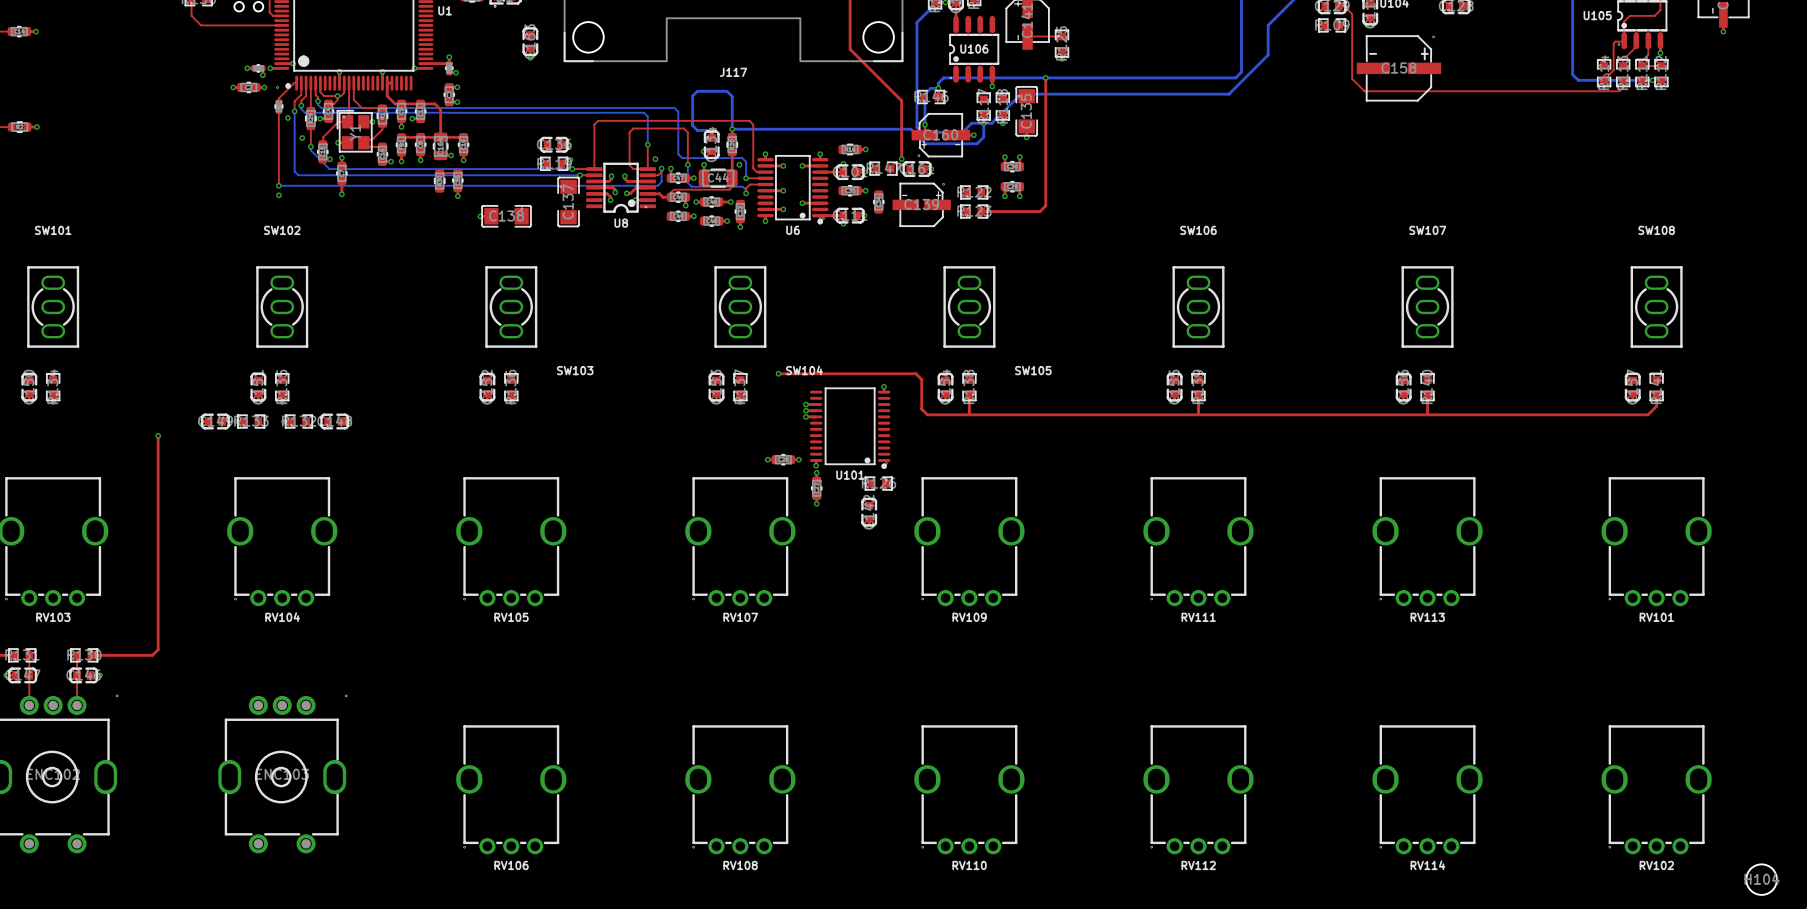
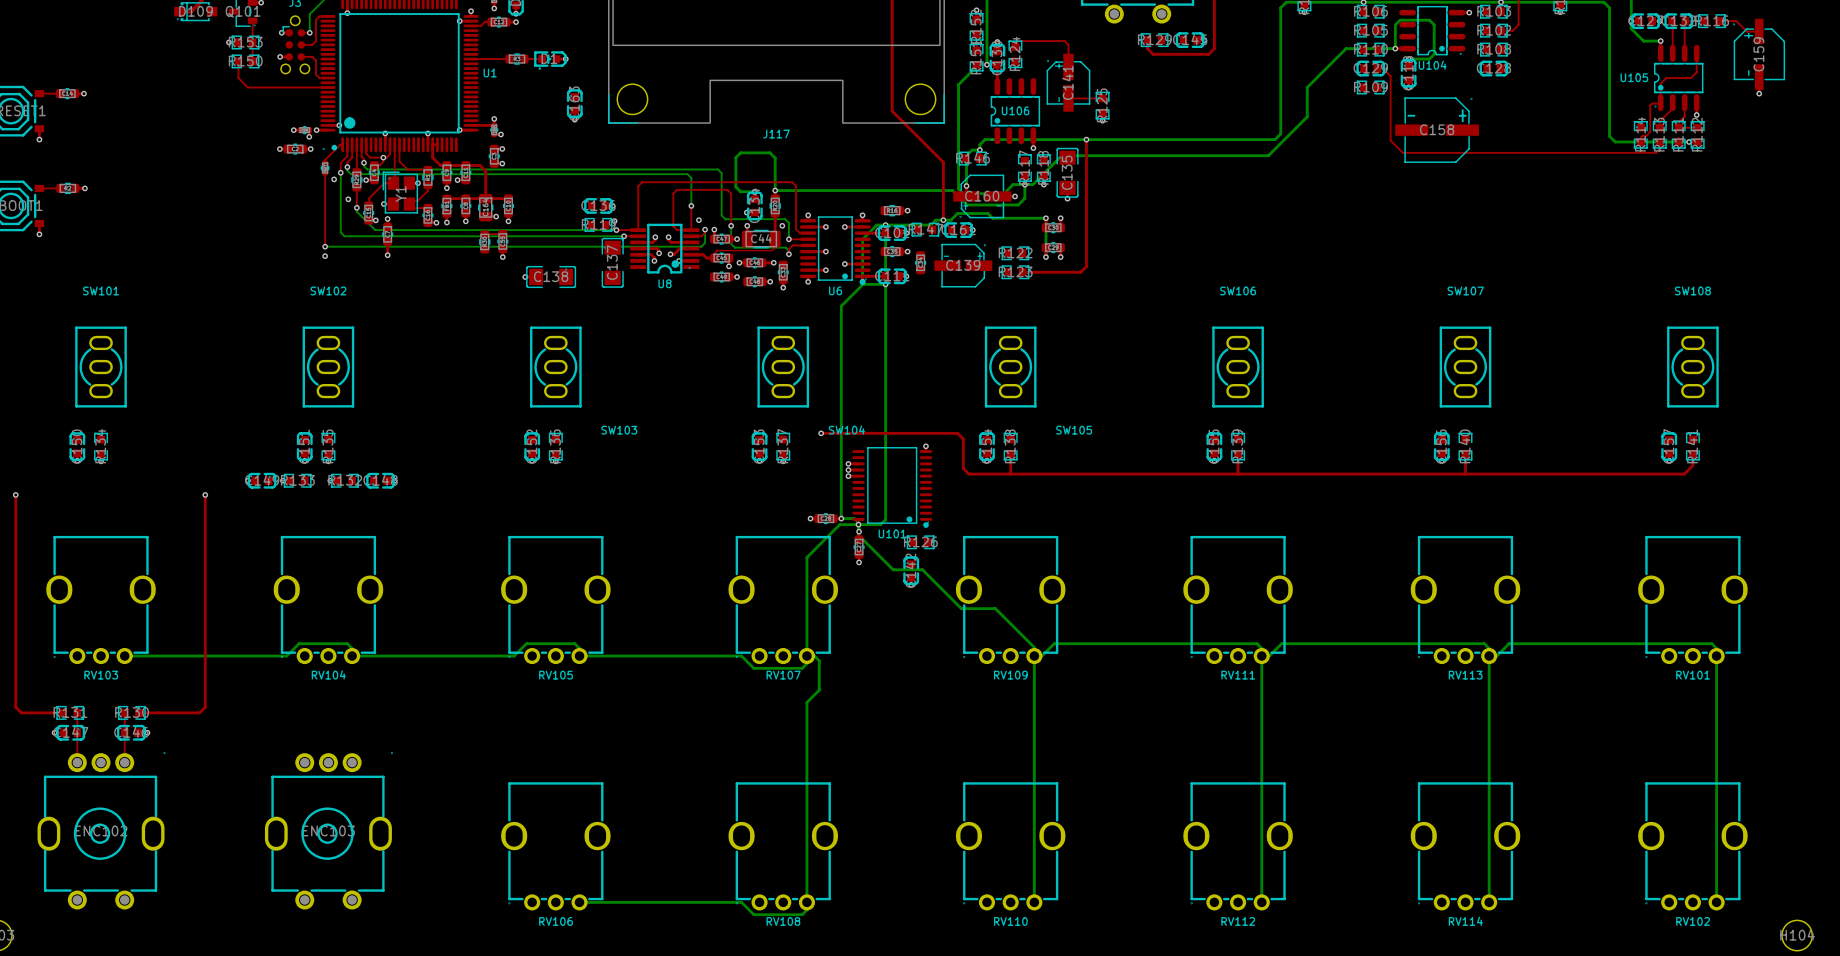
bottom track: none -> (885, 225) (885, 519) (880, 524) (839, 524) (806, 557) (806, 663) (802, 668) (753, 668) (741, 656) (579, 656) (579, 648) (574, 643) (526, 643) (514, 656) (352, 656) (352, 648) (347, 643) (299, 643) (286, 656) (124, 656)
bottom track: none -> (1045, 257) (1045, 218) (992, 218) (987, 213) (957, 213) (950, 220) (935, 220) (930, 225) (876, 225) (862, 239) (862, 281)
bottom track: none -> (885, 284) (863, 284) (841, 306) (841, 518) (854, 518) (859, 523) (859, 531)
bottom track: none -> (858, 524) (858, 535) (893, 569) (922, 569) (961, 608) (995, 608) (1034, 647) (1034, 902)
bottom track: none -> (806, 656) (814, 656) (819, 660) (819, 690) (806, 702) (806, 909) (802, 914) (753, 914) (741, 902) (579, 902)
bottom track: none -> (1034, 656) (1041, 656) (1054, 643) (1257, 643) (1261, 648) (1261, 902)
bottom track: none -> (1261, 656) (1269, 656) (1281, 643) (1484, 643) (1489, 648) (1489, 902)
bottom track: none -> (1489, 656) (1496, 656) (1509, 643) (1711, 643) (1716, 648) (1716, 902)

